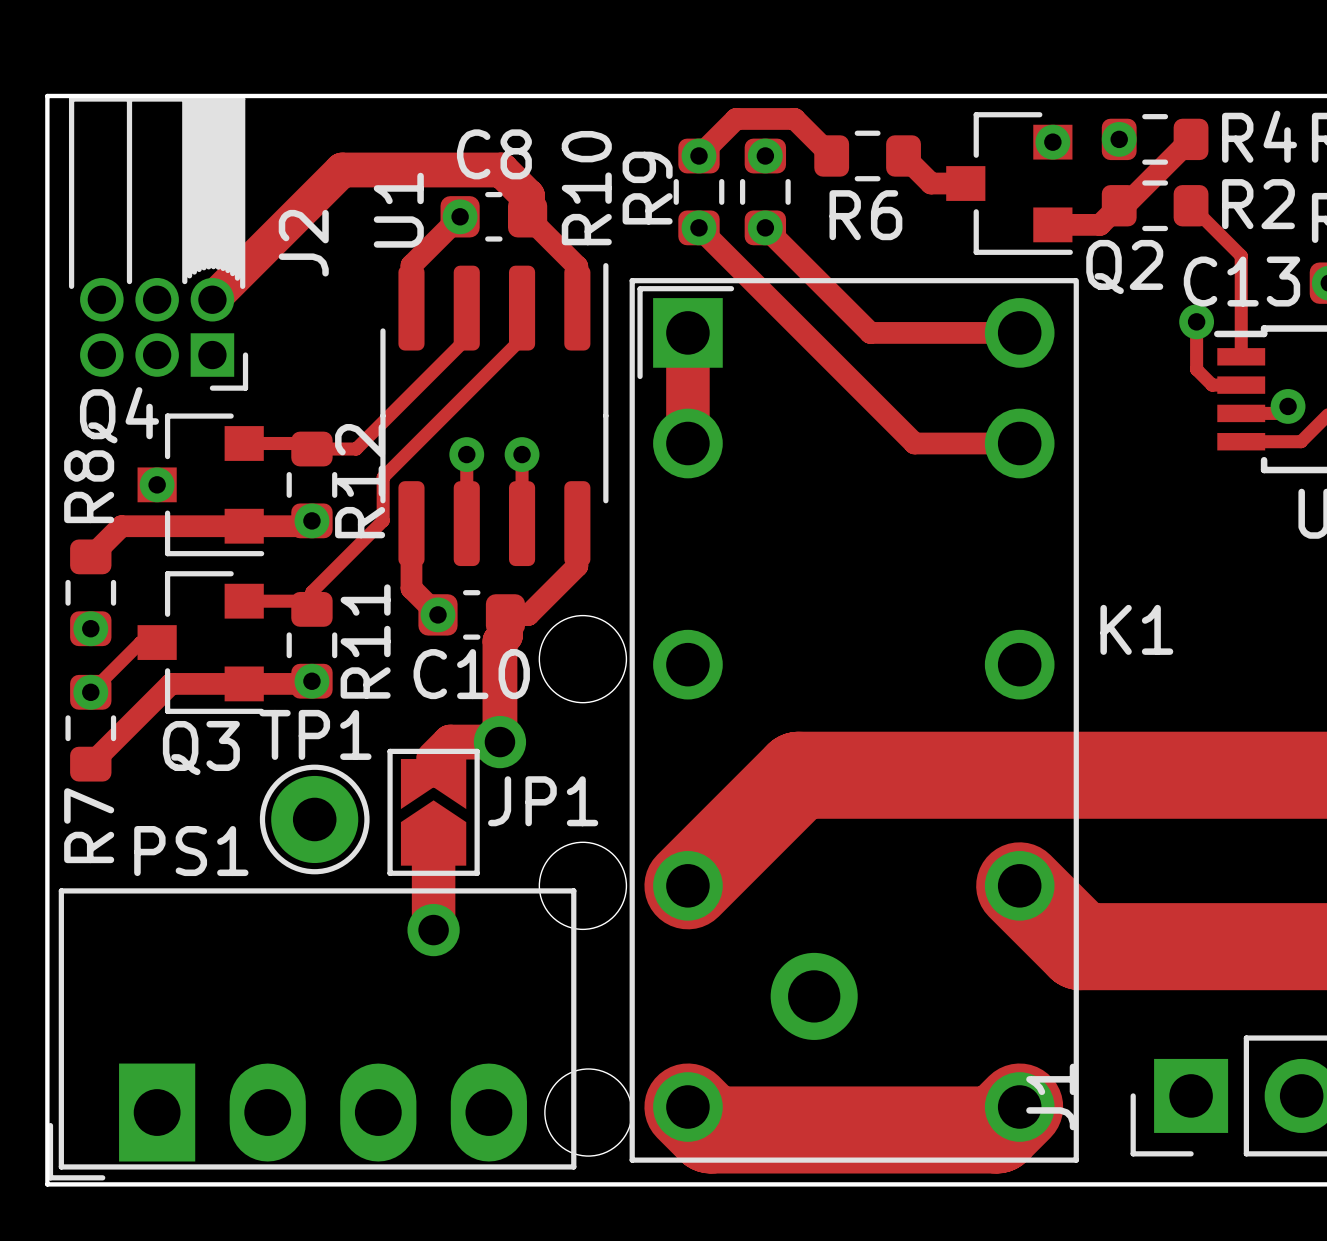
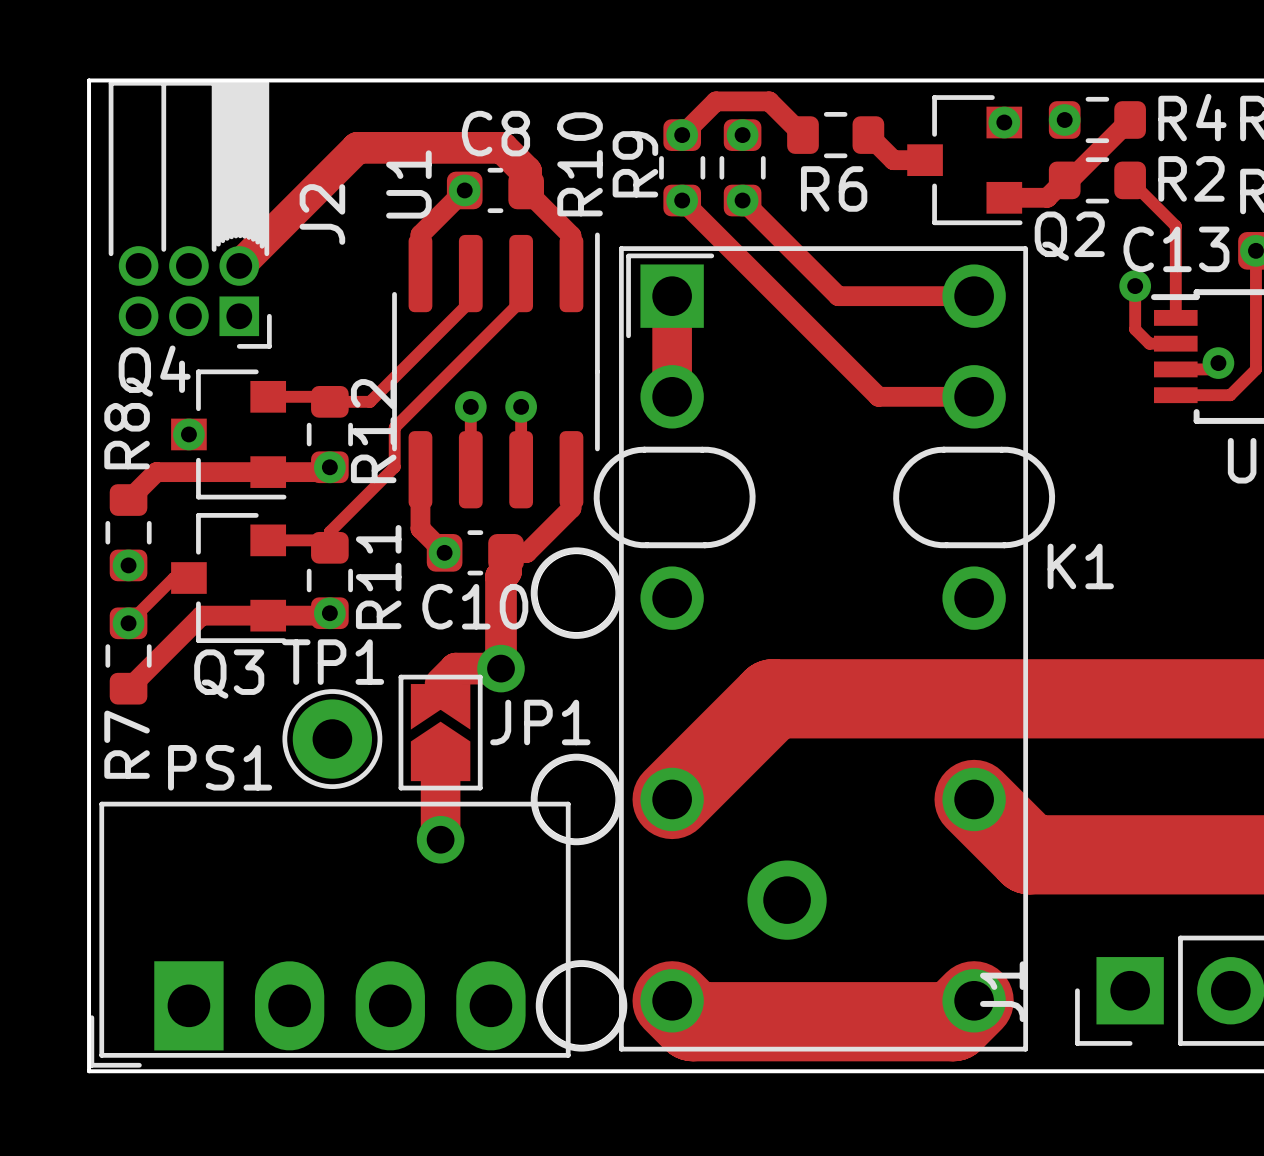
line: none -> (644, 449) (708, 449) (725, 454) (734, 460) (746, 473) (752, 496) (749, 513) (741, 528) (727, 539) (704, 545) (641, 545) (629, 542) (614, 534) (602, 521) (598, 510) (596, 498) (599, 481) (604, 470) (616, 458) (627, 452) (644, 449)
line: none -> (943, 449) (1007, 449) (1024, 454) (1034, 460) (1045, 473) (1052, 496) (1049, 513) (1040, 528) (1026, 539) (1004, 545) (940, 545) (929, 542) (913, 534) (902, 521) (897, 510) (896, 498) (898, 481) (904, 470) (916, 458) (926, 452) (943, 449)
drawing: none -> [530, 547, 623, 639]
drawing: none -> [530, 753, 623, 846]
drawing: none -> [535, 960, 628, 1052]

